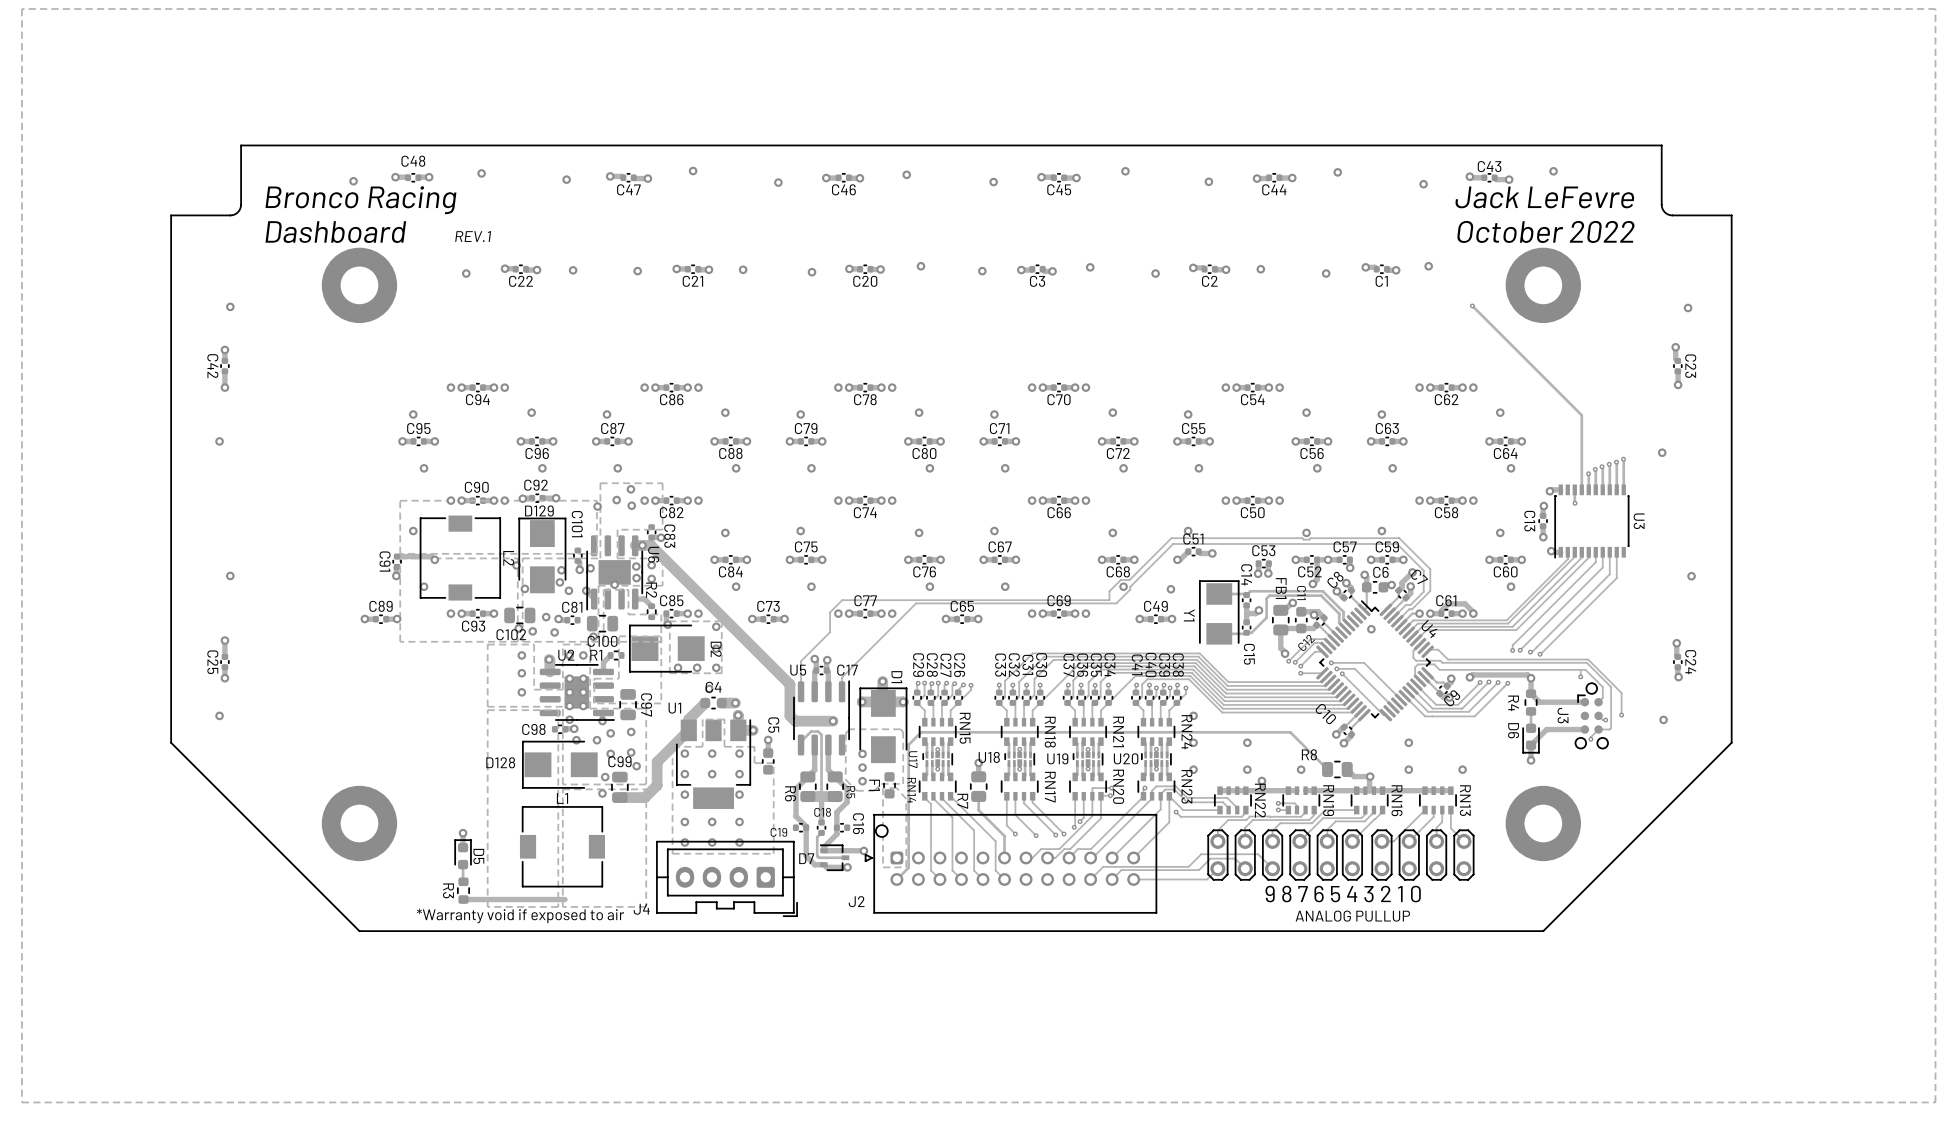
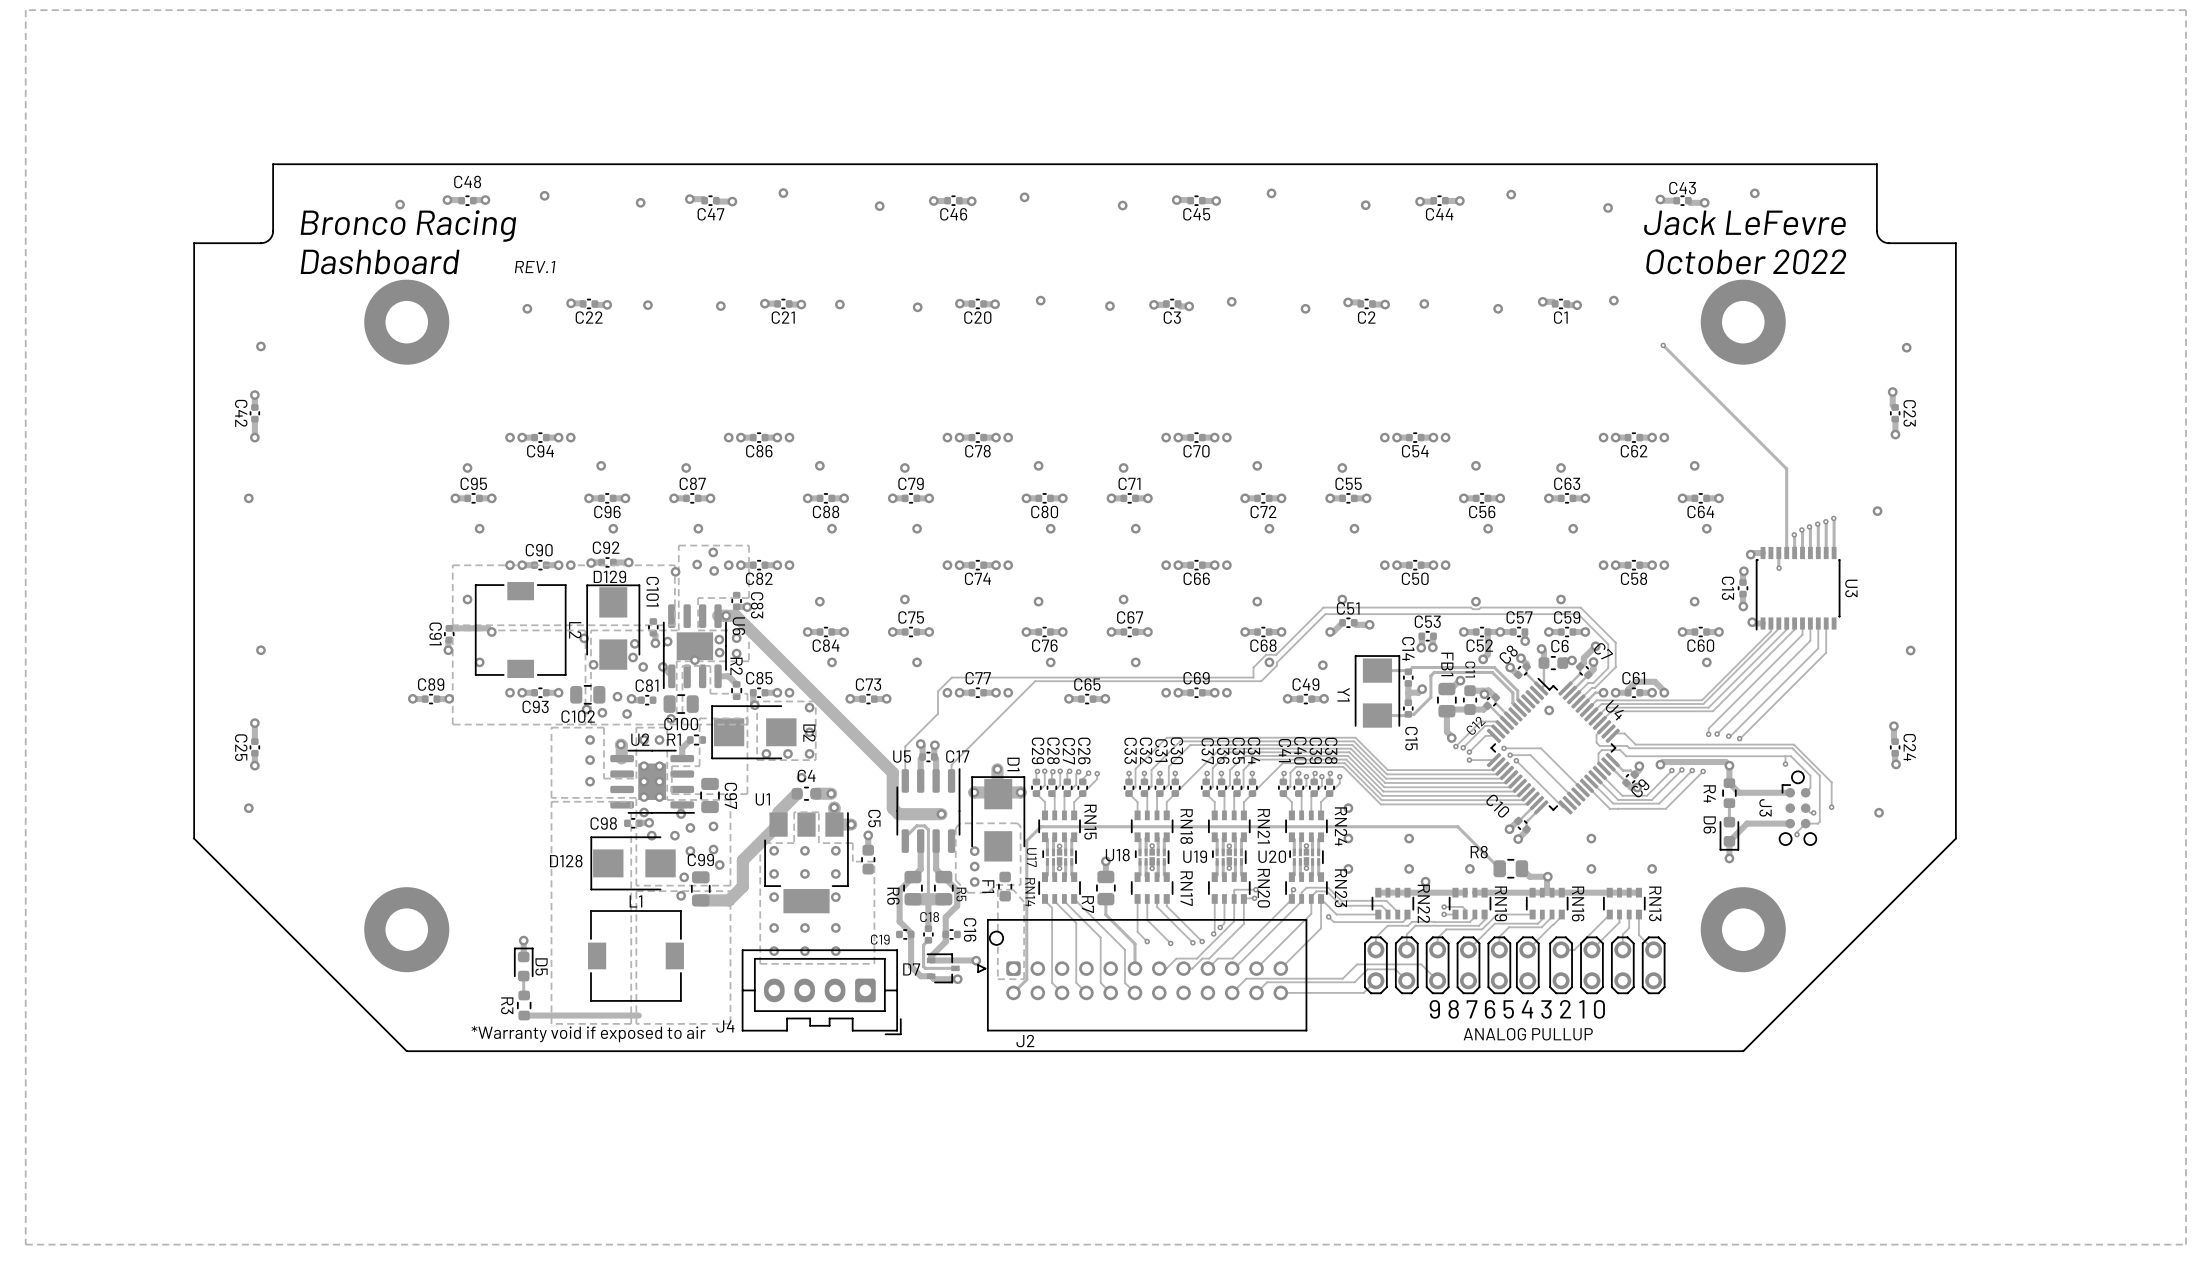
J2 name position: J2 (856, 901) -> J2 (1025, 1041)

